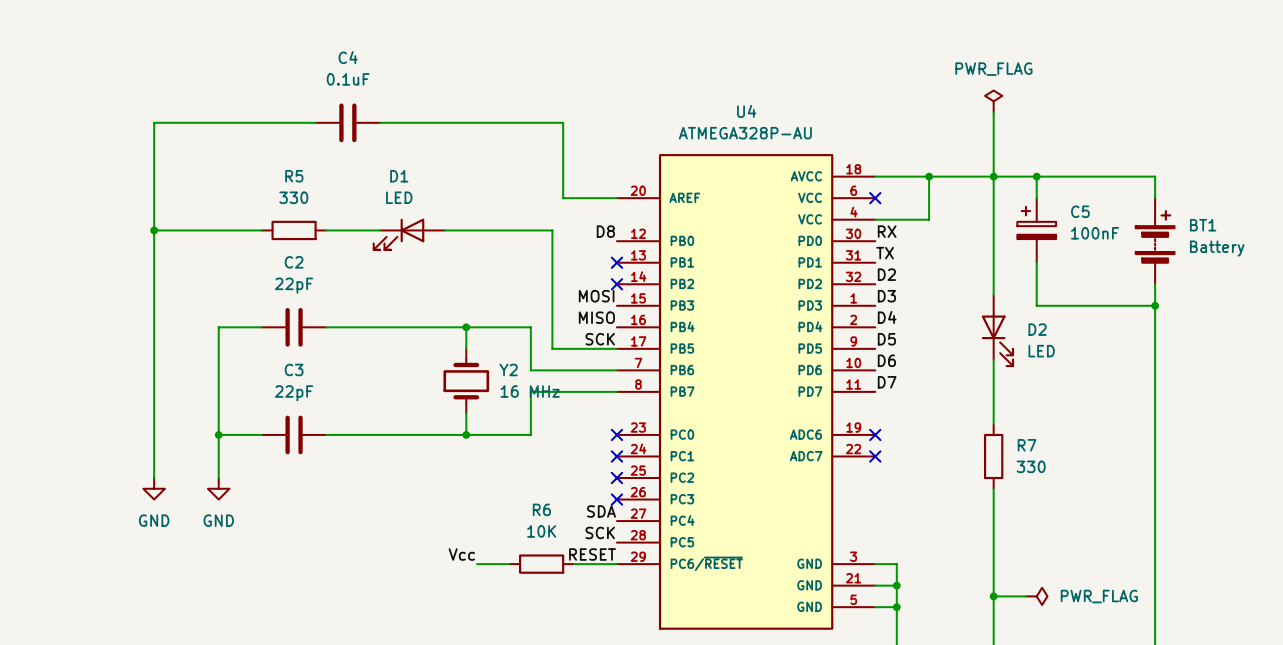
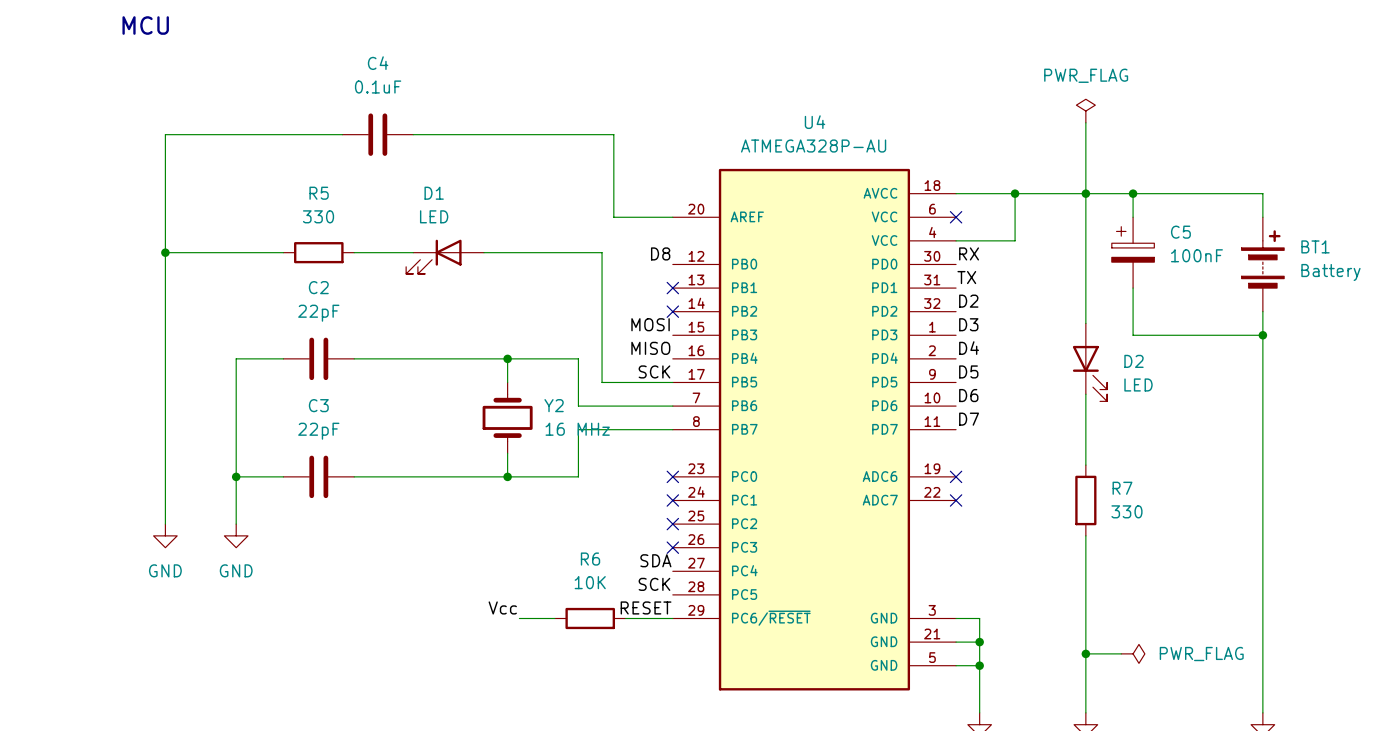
text: none -> MCU (145, 25)

